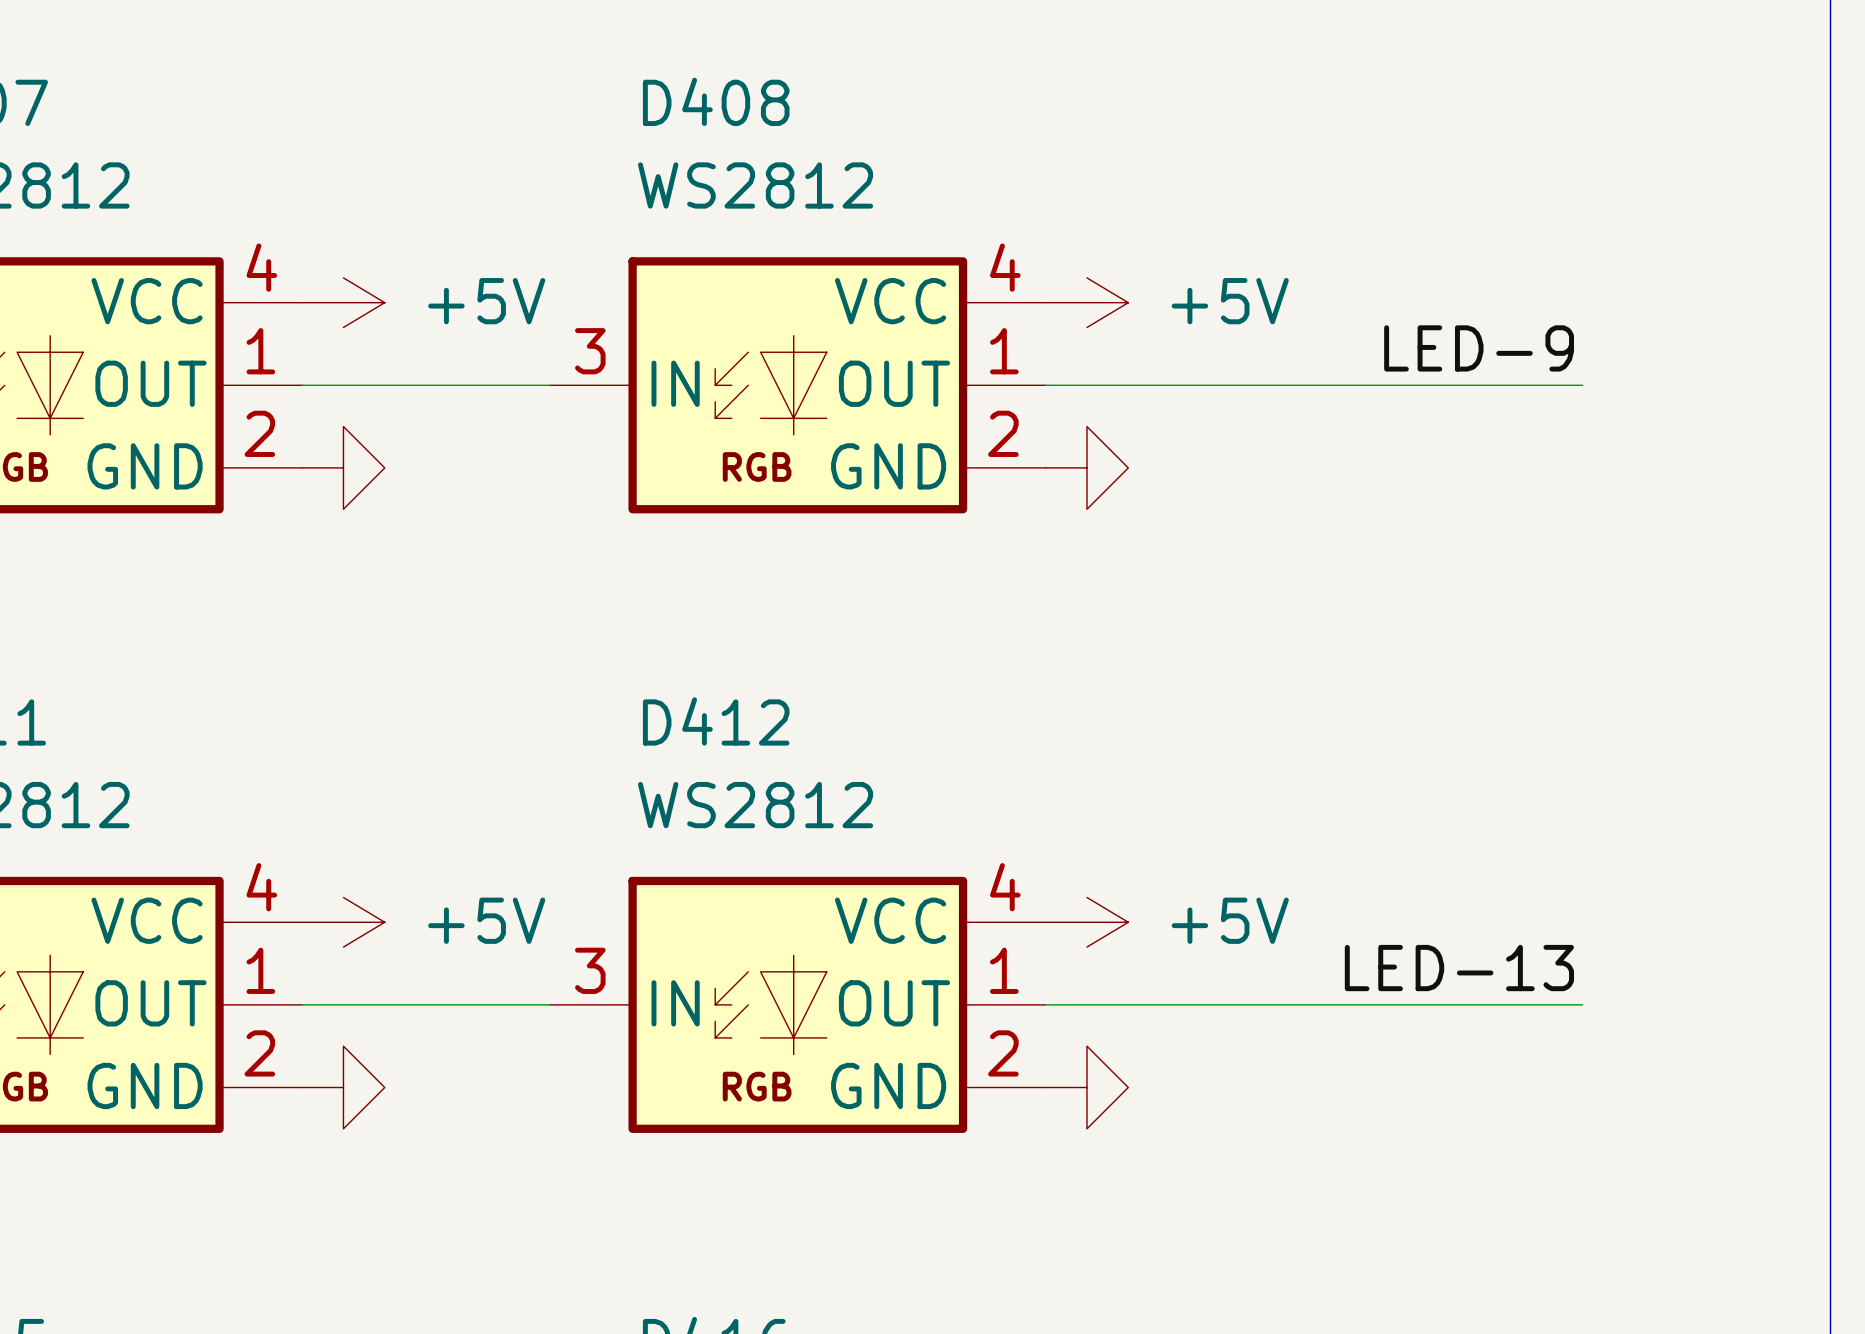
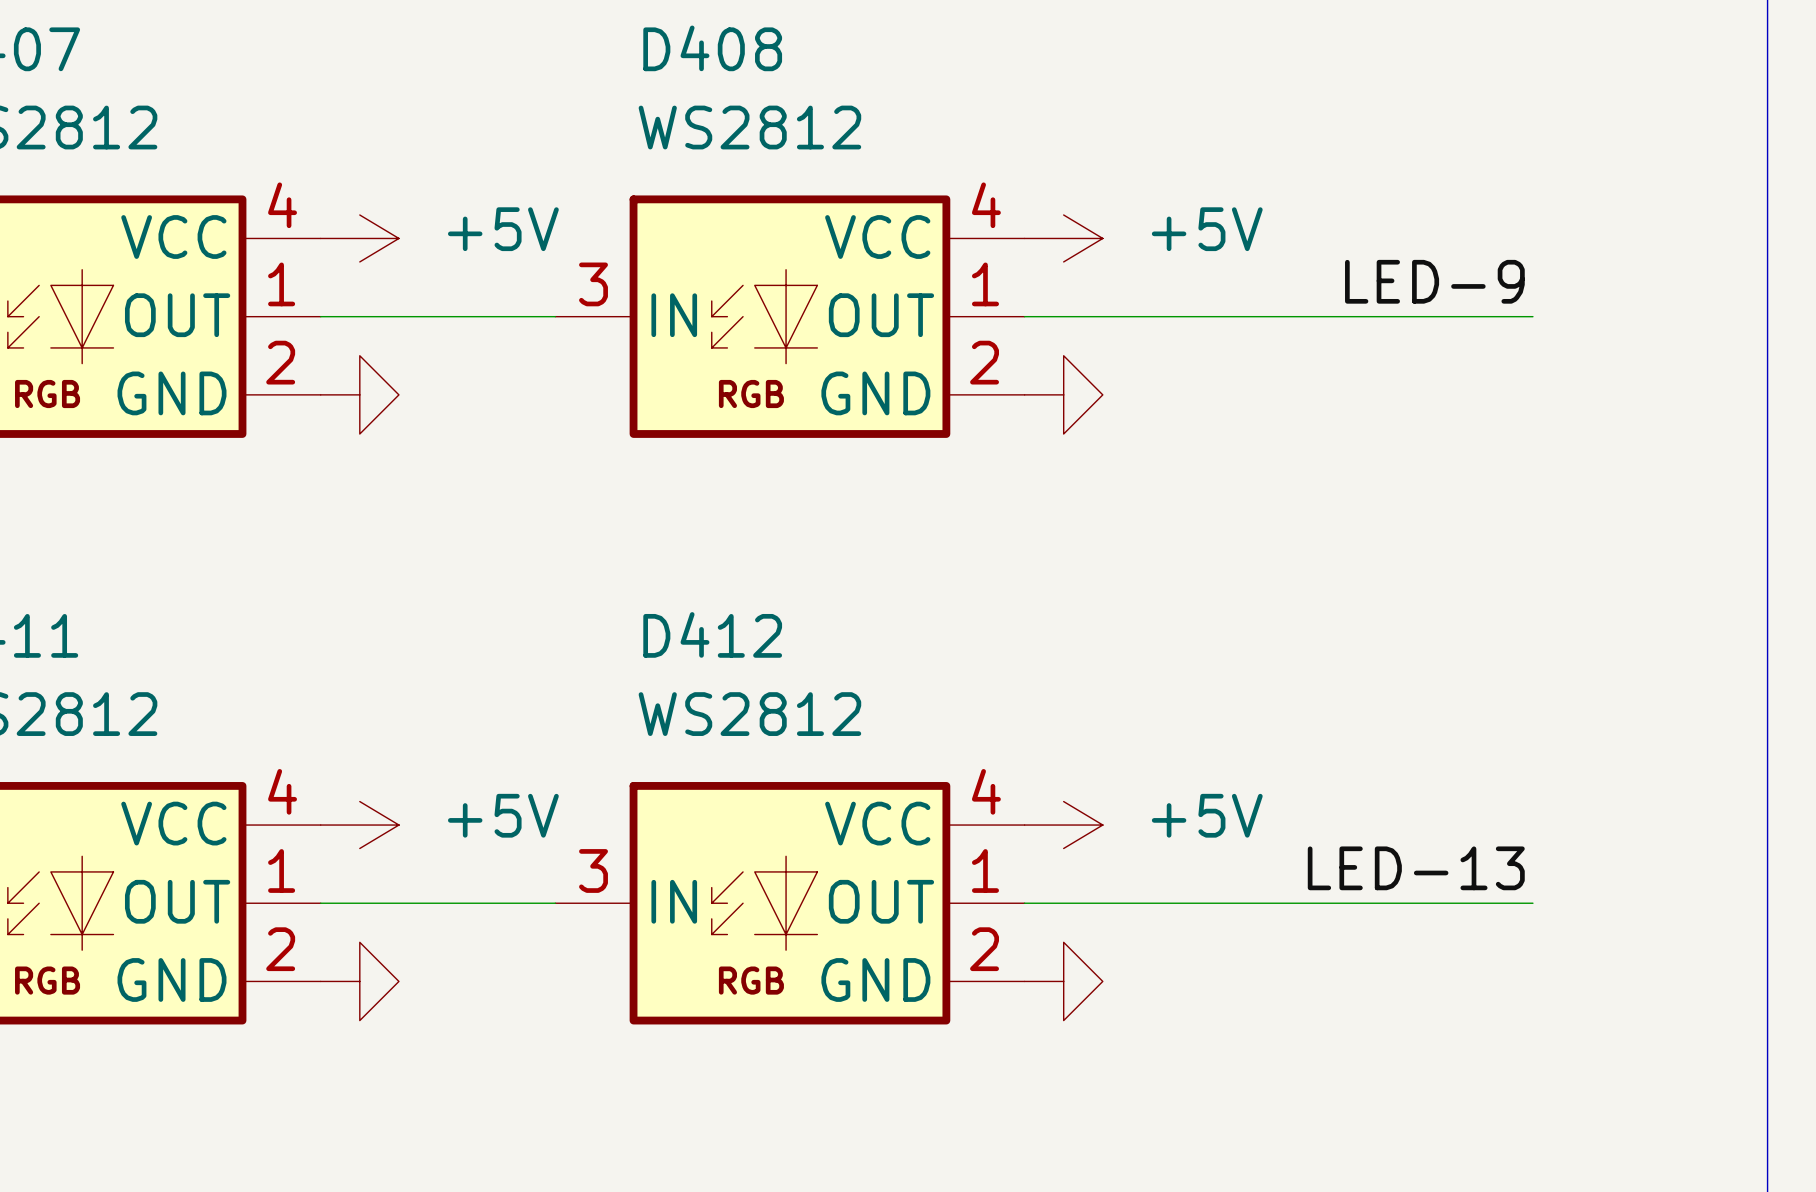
power symbol text position: +5V (486, 301) -> +5V (503, 229)
power symbol text position: +5V (1230, 301) -> +5V (1207, 229)
power symbol text position: +5V (486, 920) -> +5V (503, 815)
power symbol text position: +5V (1230, 920) -> +5V (1207, 815)

